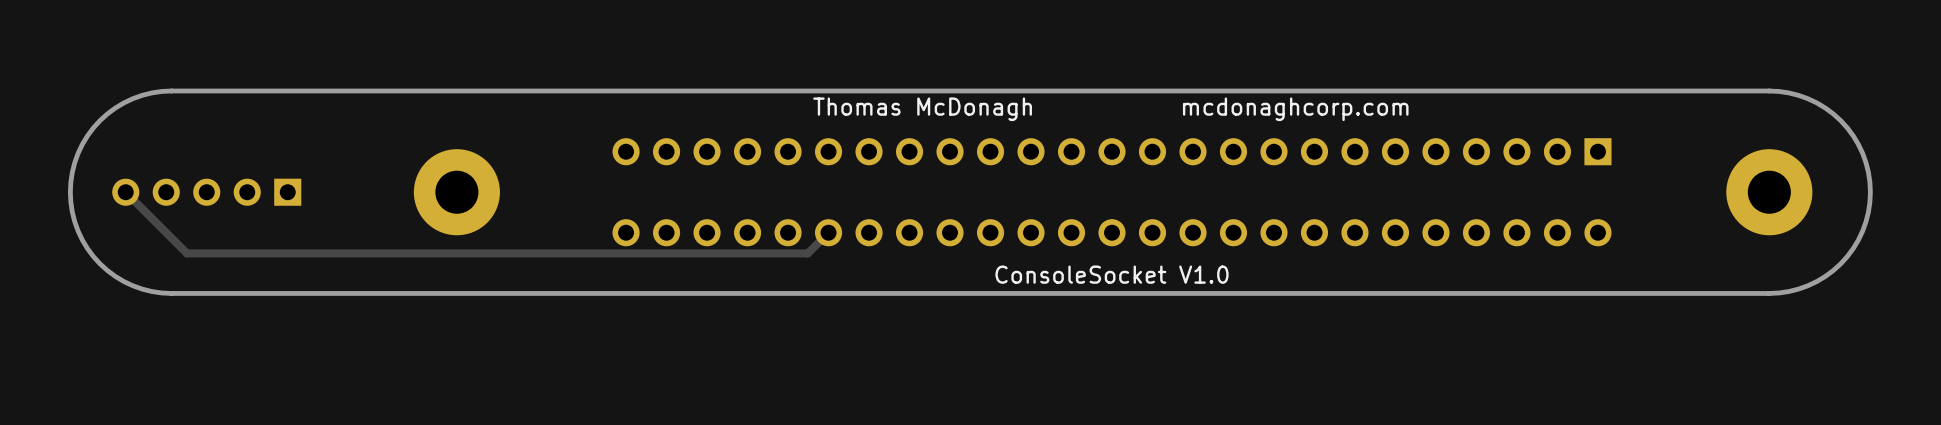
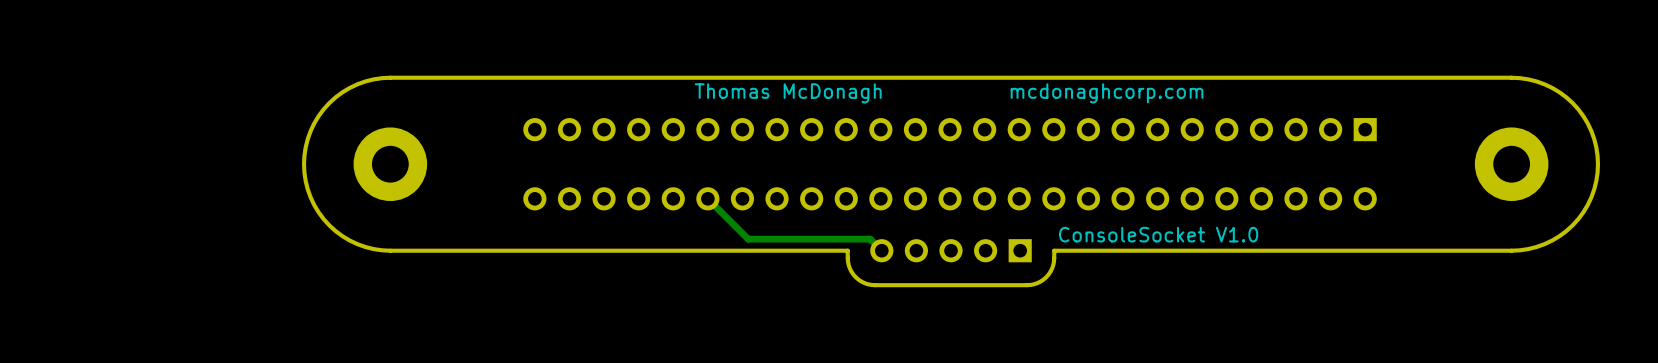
board edge: (457, 90) (171, 90) (142, 95) (115, 108) (93, 127) (82, 144) (74, 162) (70, 192) (74, 221) (82, 239) (93, 256) (115, 276) (142, 289) (171, 293) (457, 293) -> (390, 77) (373, 79) (357, 84) (342, 92) (329, 103) (318, 116) (310, 131) (305, 147) (304, 164) (305, 181) (310, 197) (318, 212) (329, 225) (342, 236) (357, 244) (373, 249) (390, 250)
track: (125, 192) (186, 253) (807, 253) (828, 232) -> (881, 250) (870, 239) (748, 239) (707, 198)
part: (206, 192) -> none
text position: ConsoleSocket V1.0 (1112, 274) -> ConsoleSocket V1.0 (1158, 234)
part: none -> (951, 250)
board edge: (1233, 293) (992, 293) -> (1054, 250) (1053, 264) (1048, 274) (1040, 281) (1027, 285) (871, 284) (861, 281) (853, 274) (848, 264) (847, 250)

